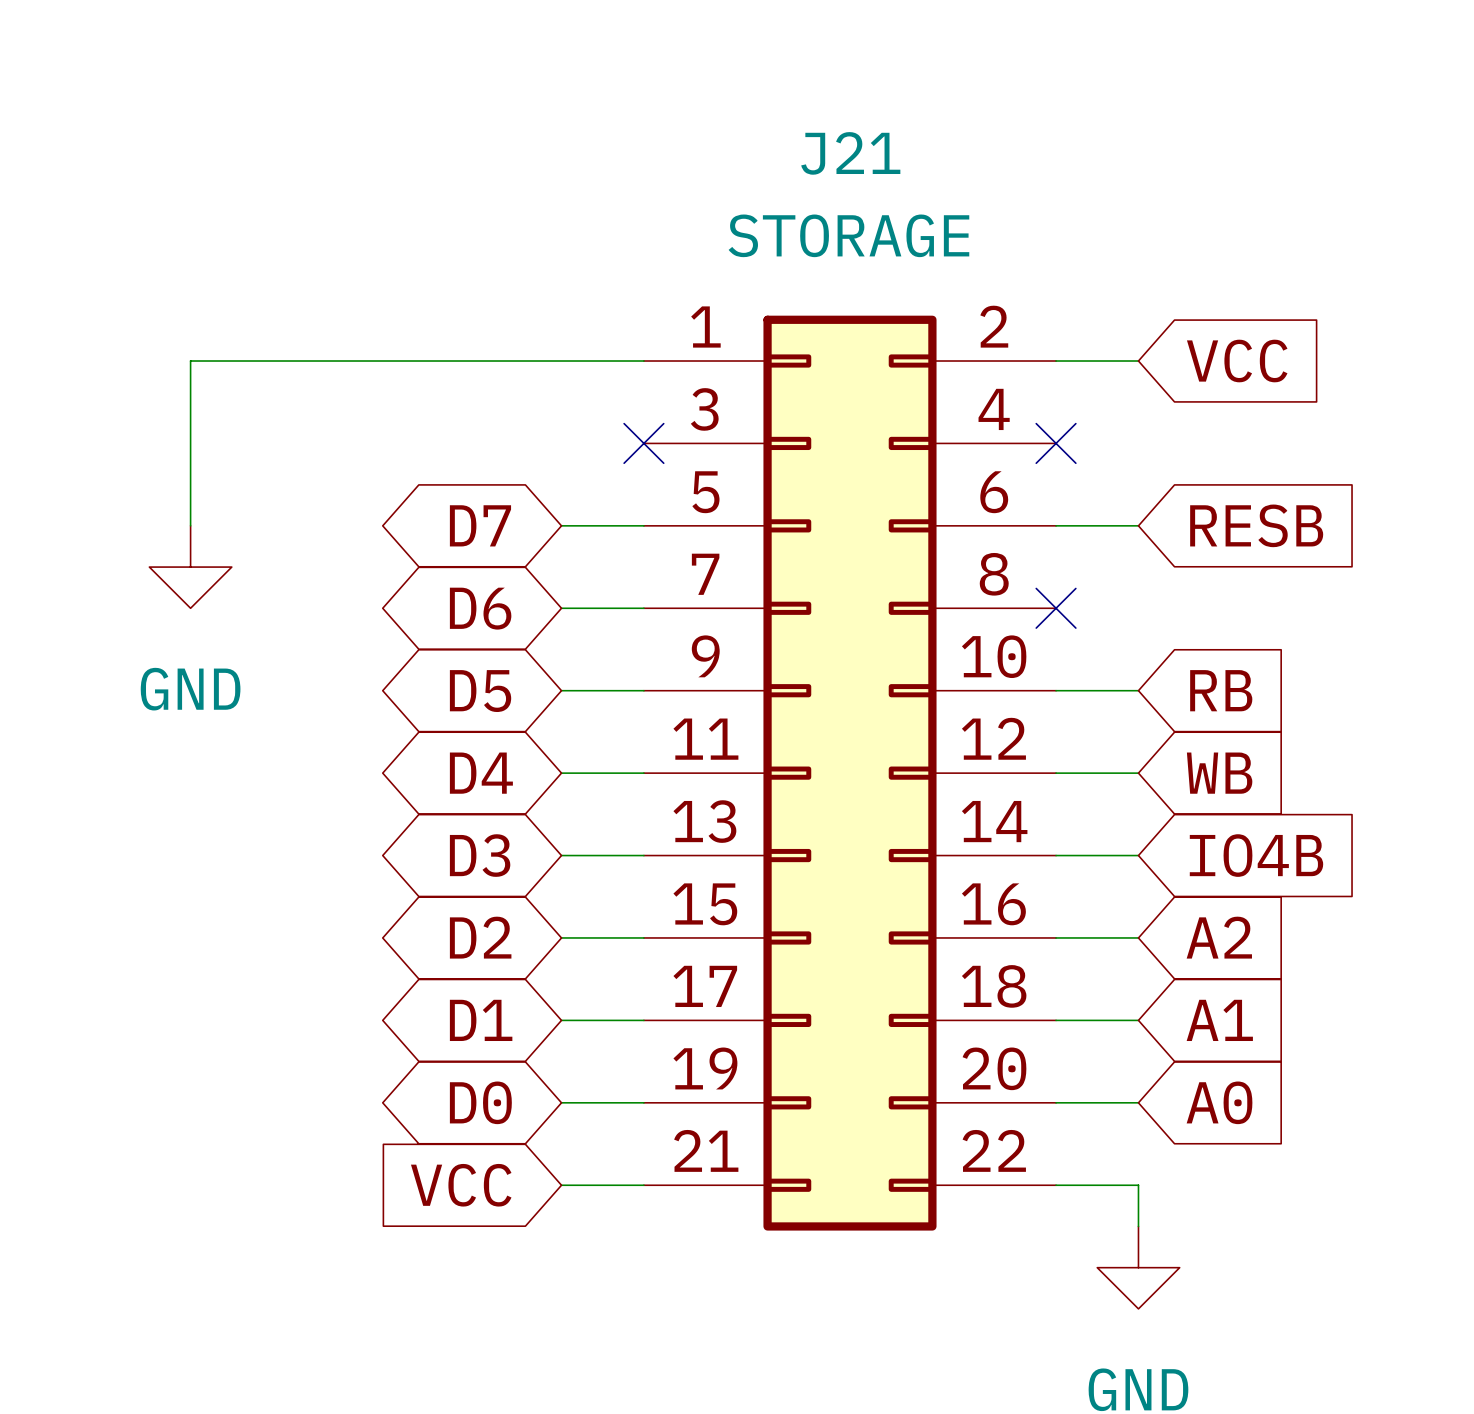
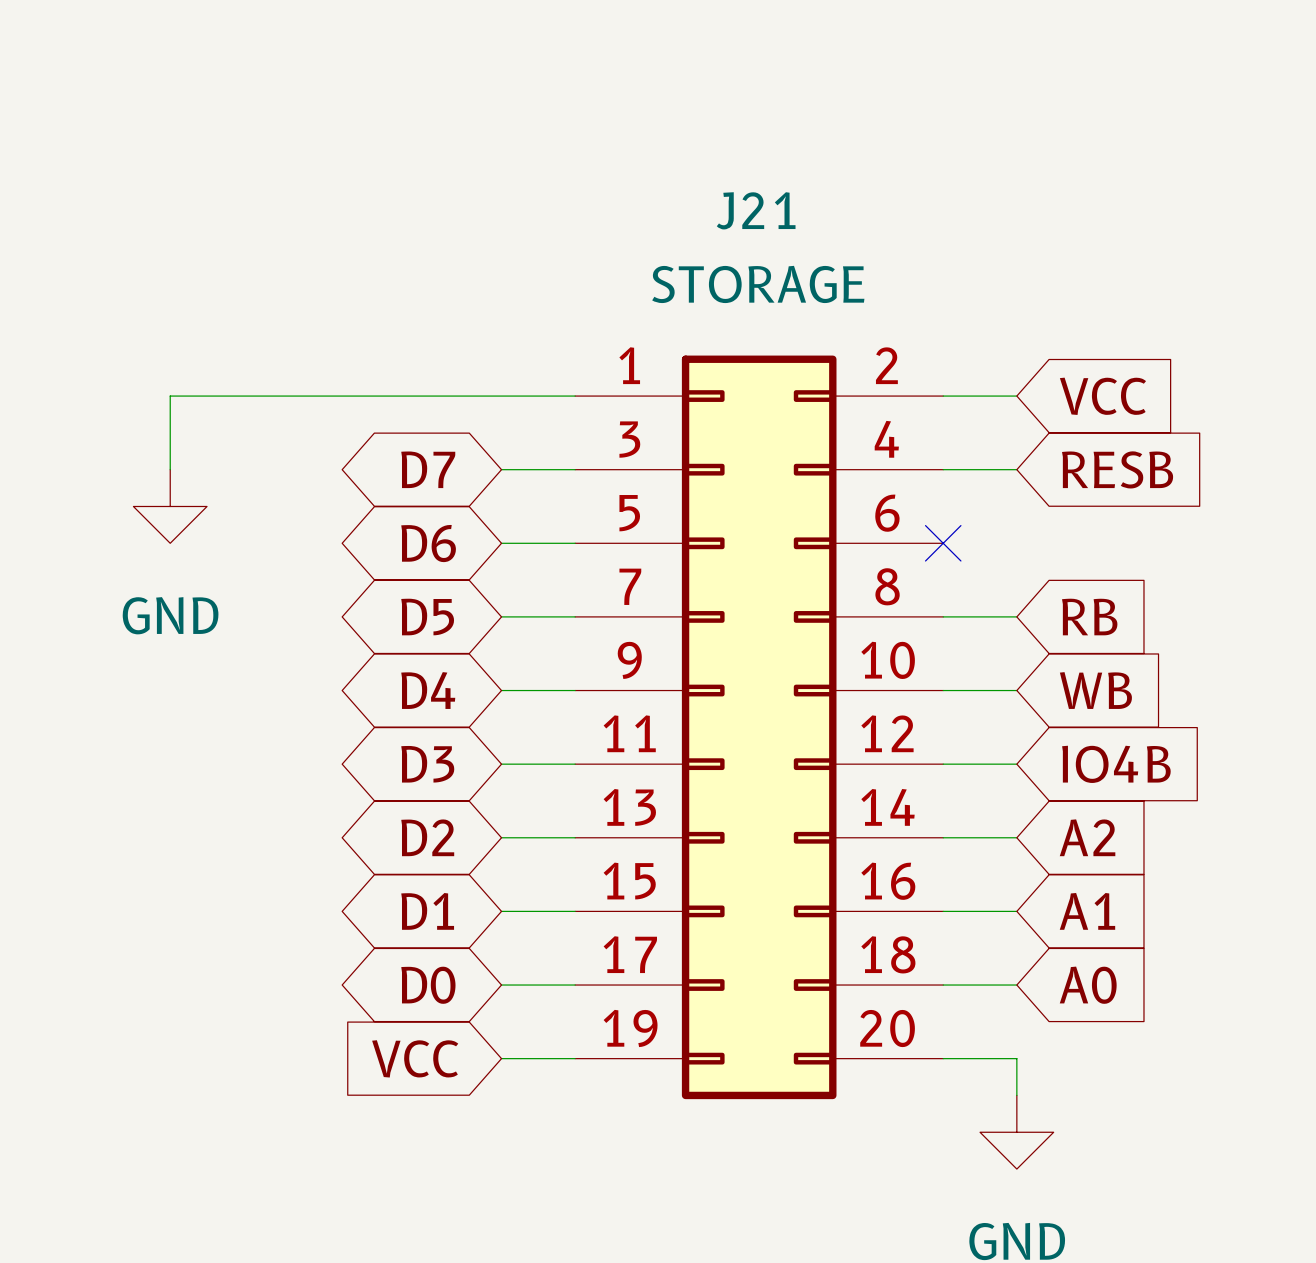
J21 symbol: [643, 315, 1057, 1231] -> [575, 355, 944, 1100]
wire: (643, 361) (190, 361) (190, 443) -> (575, 396) (170, 396)
wire: (1056, 361) (1138, 361) -> (943, 396) (1016, 396)
global label position: VCC (1237, 361) -> VCC (1102, 396)
no-connect mark: (643, 443) -> none
no-connect mark: (1056, 443) -> none

